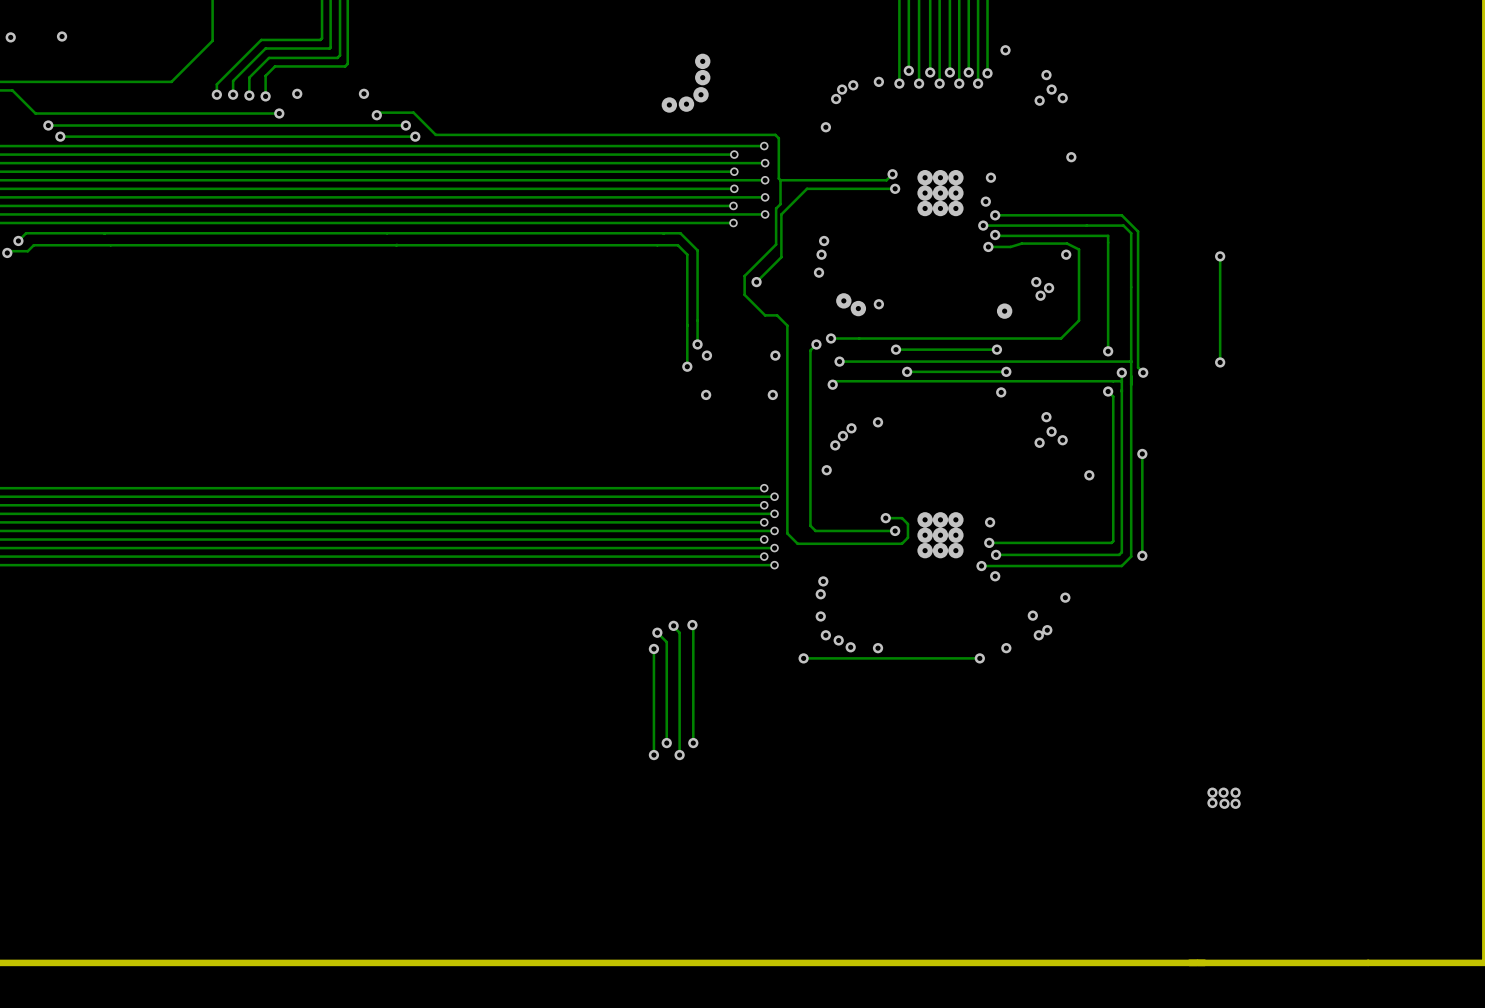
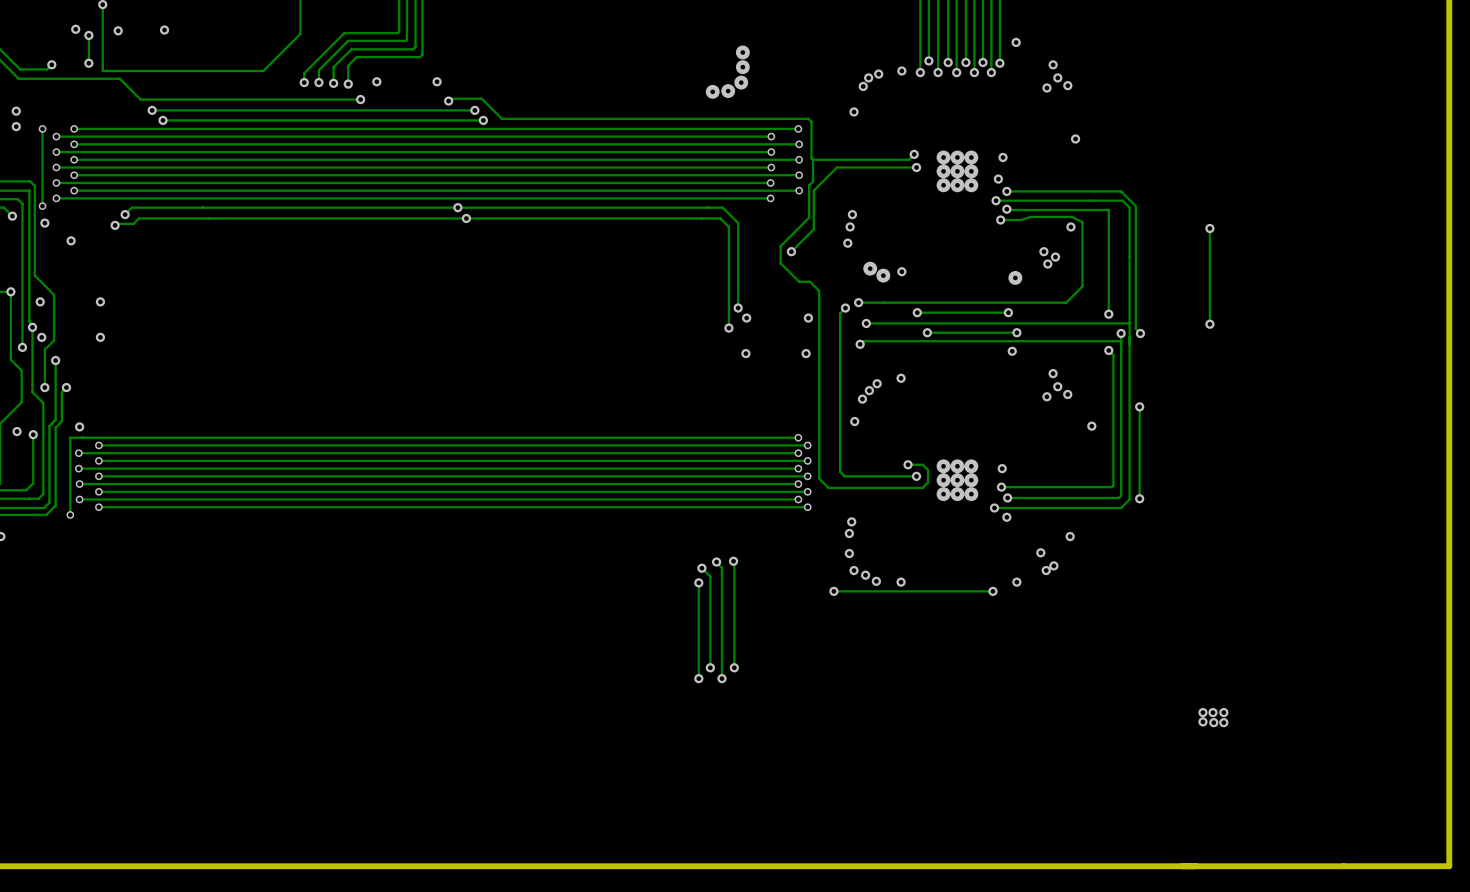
via: none -> (457, 207)
via: none -> (466, 218)

